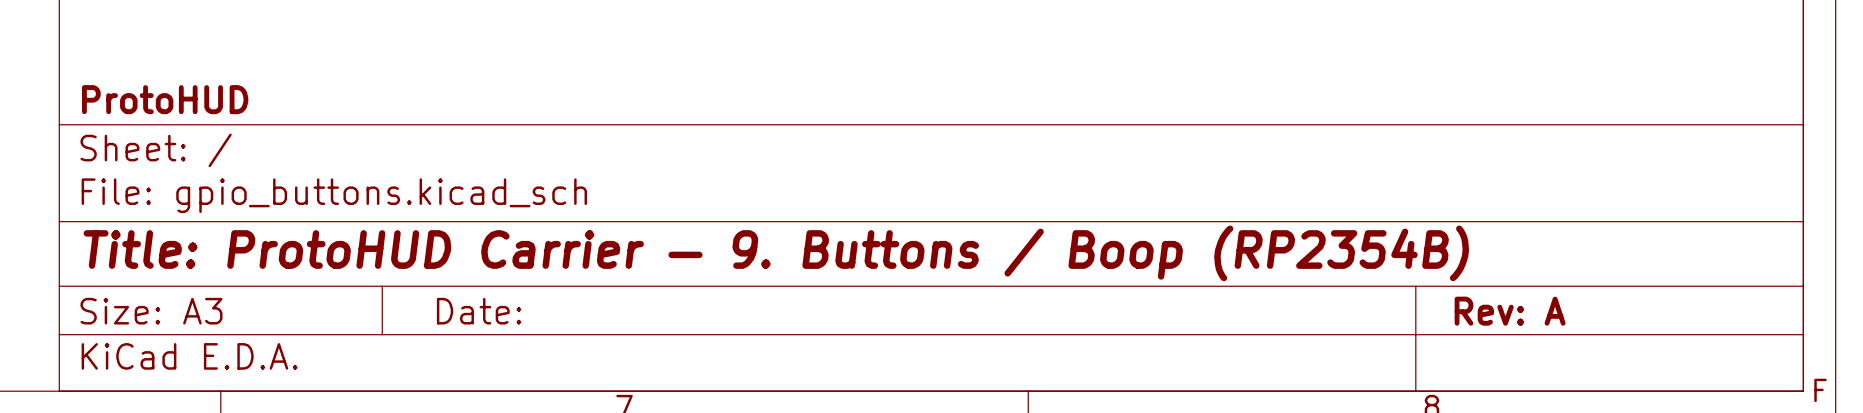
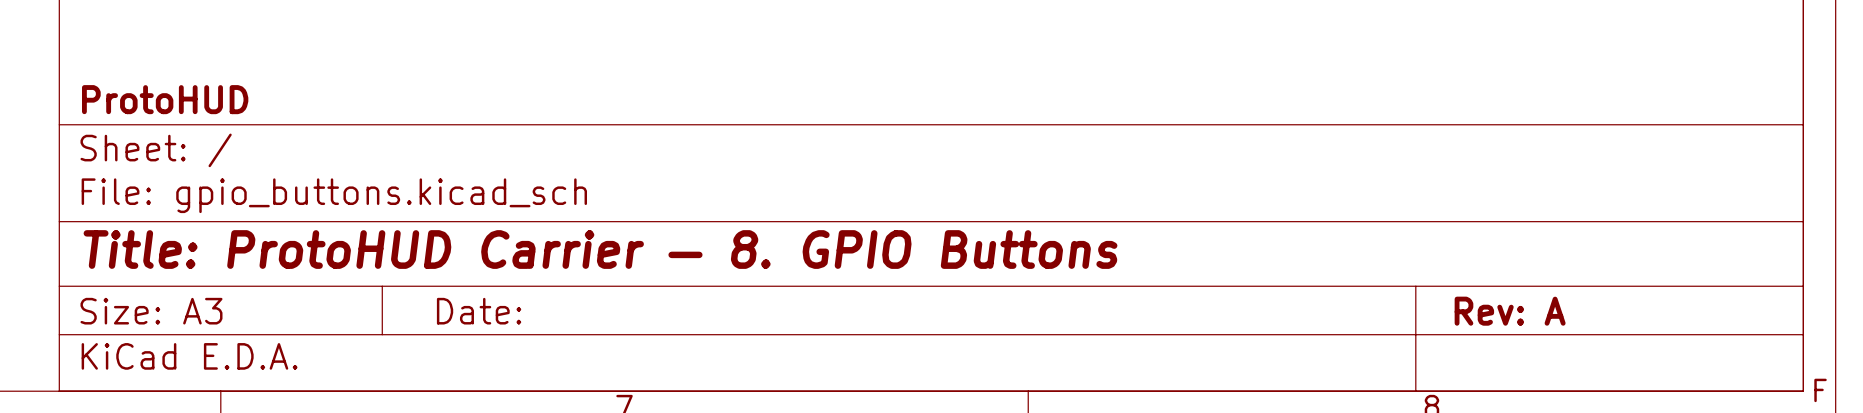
title block: Title: ProtoHUD Carrier — 9. Buttons / Boop (RP2354B) (776, 253) -> Title: ProtoHUD Carrier — 8. GPIO Buttons (600, 249)

